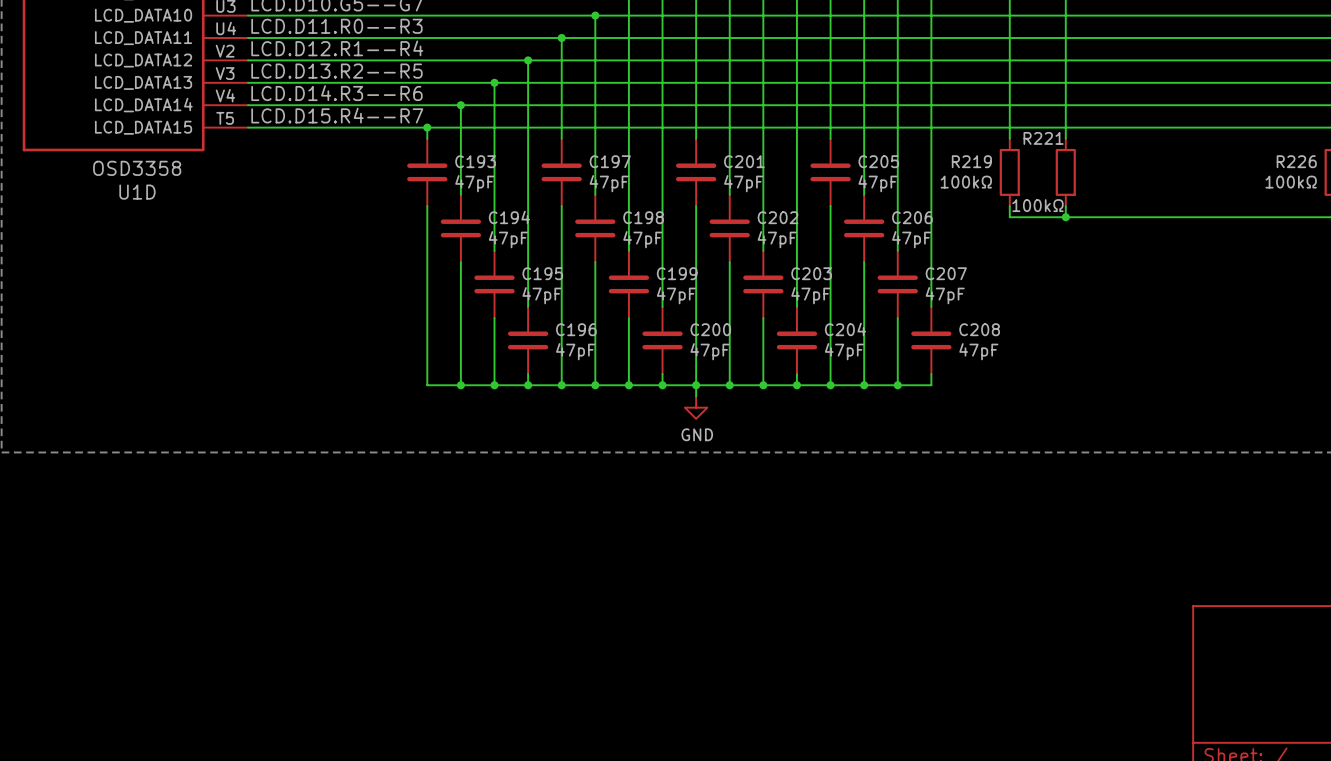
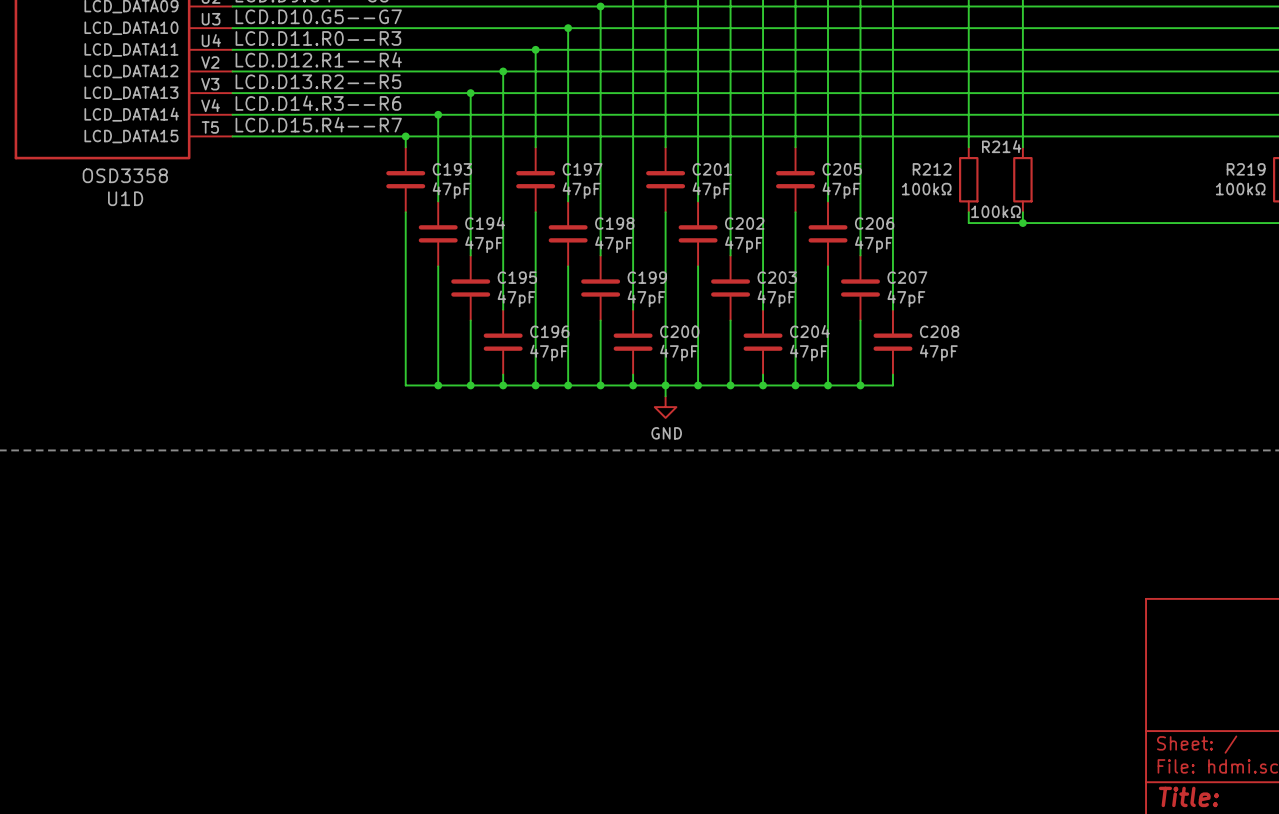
R221 name: R221 (1043, 138) -> R214 (1001, 146)
R219 name: R219 (971, 161) -> R212 (932, 169)
R226 name: R226 (1296, 161) -> R219 (1246, 169)

